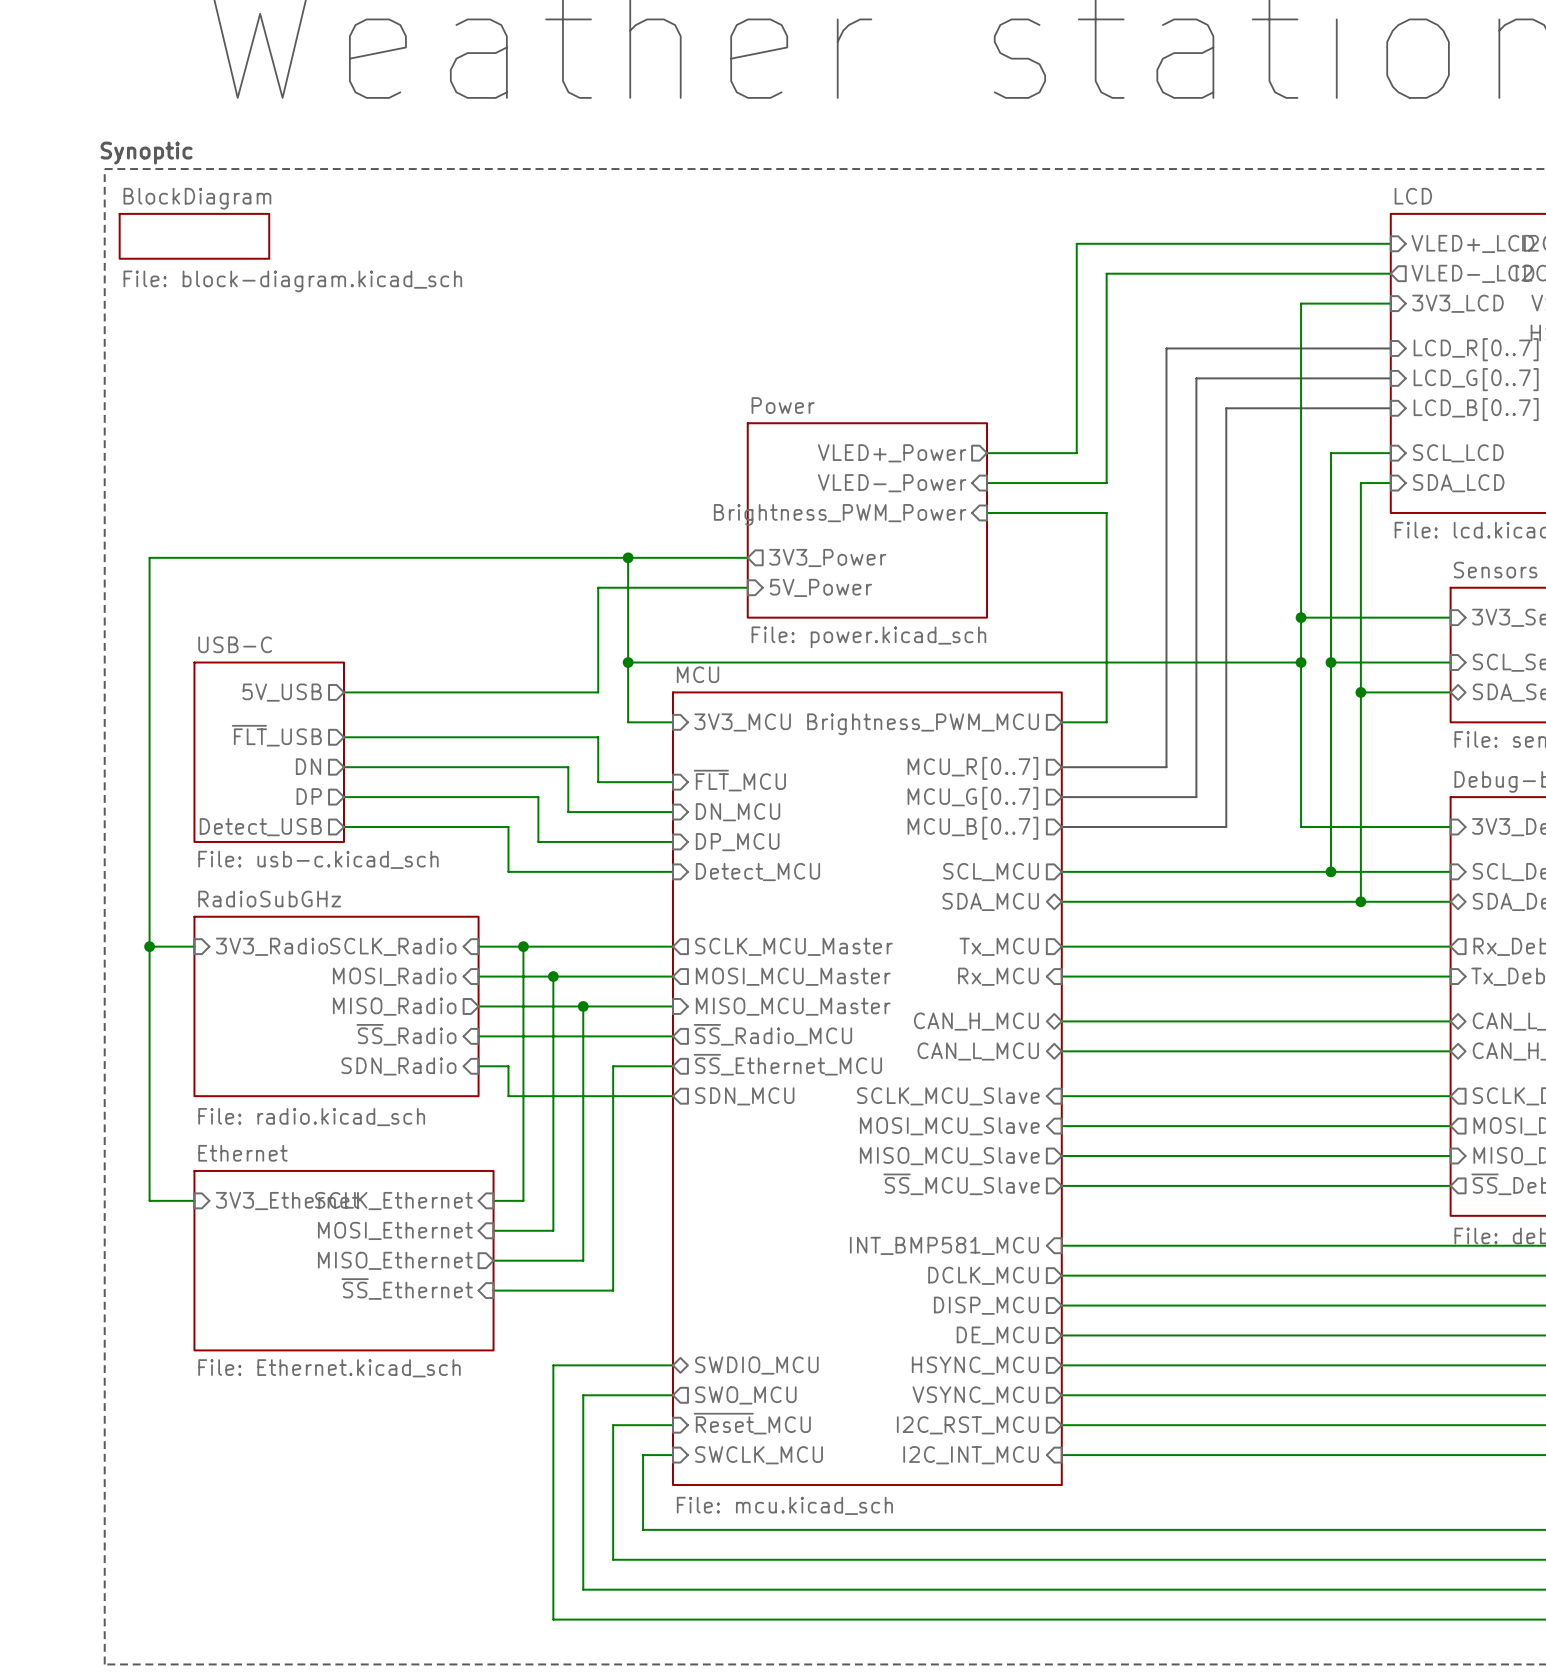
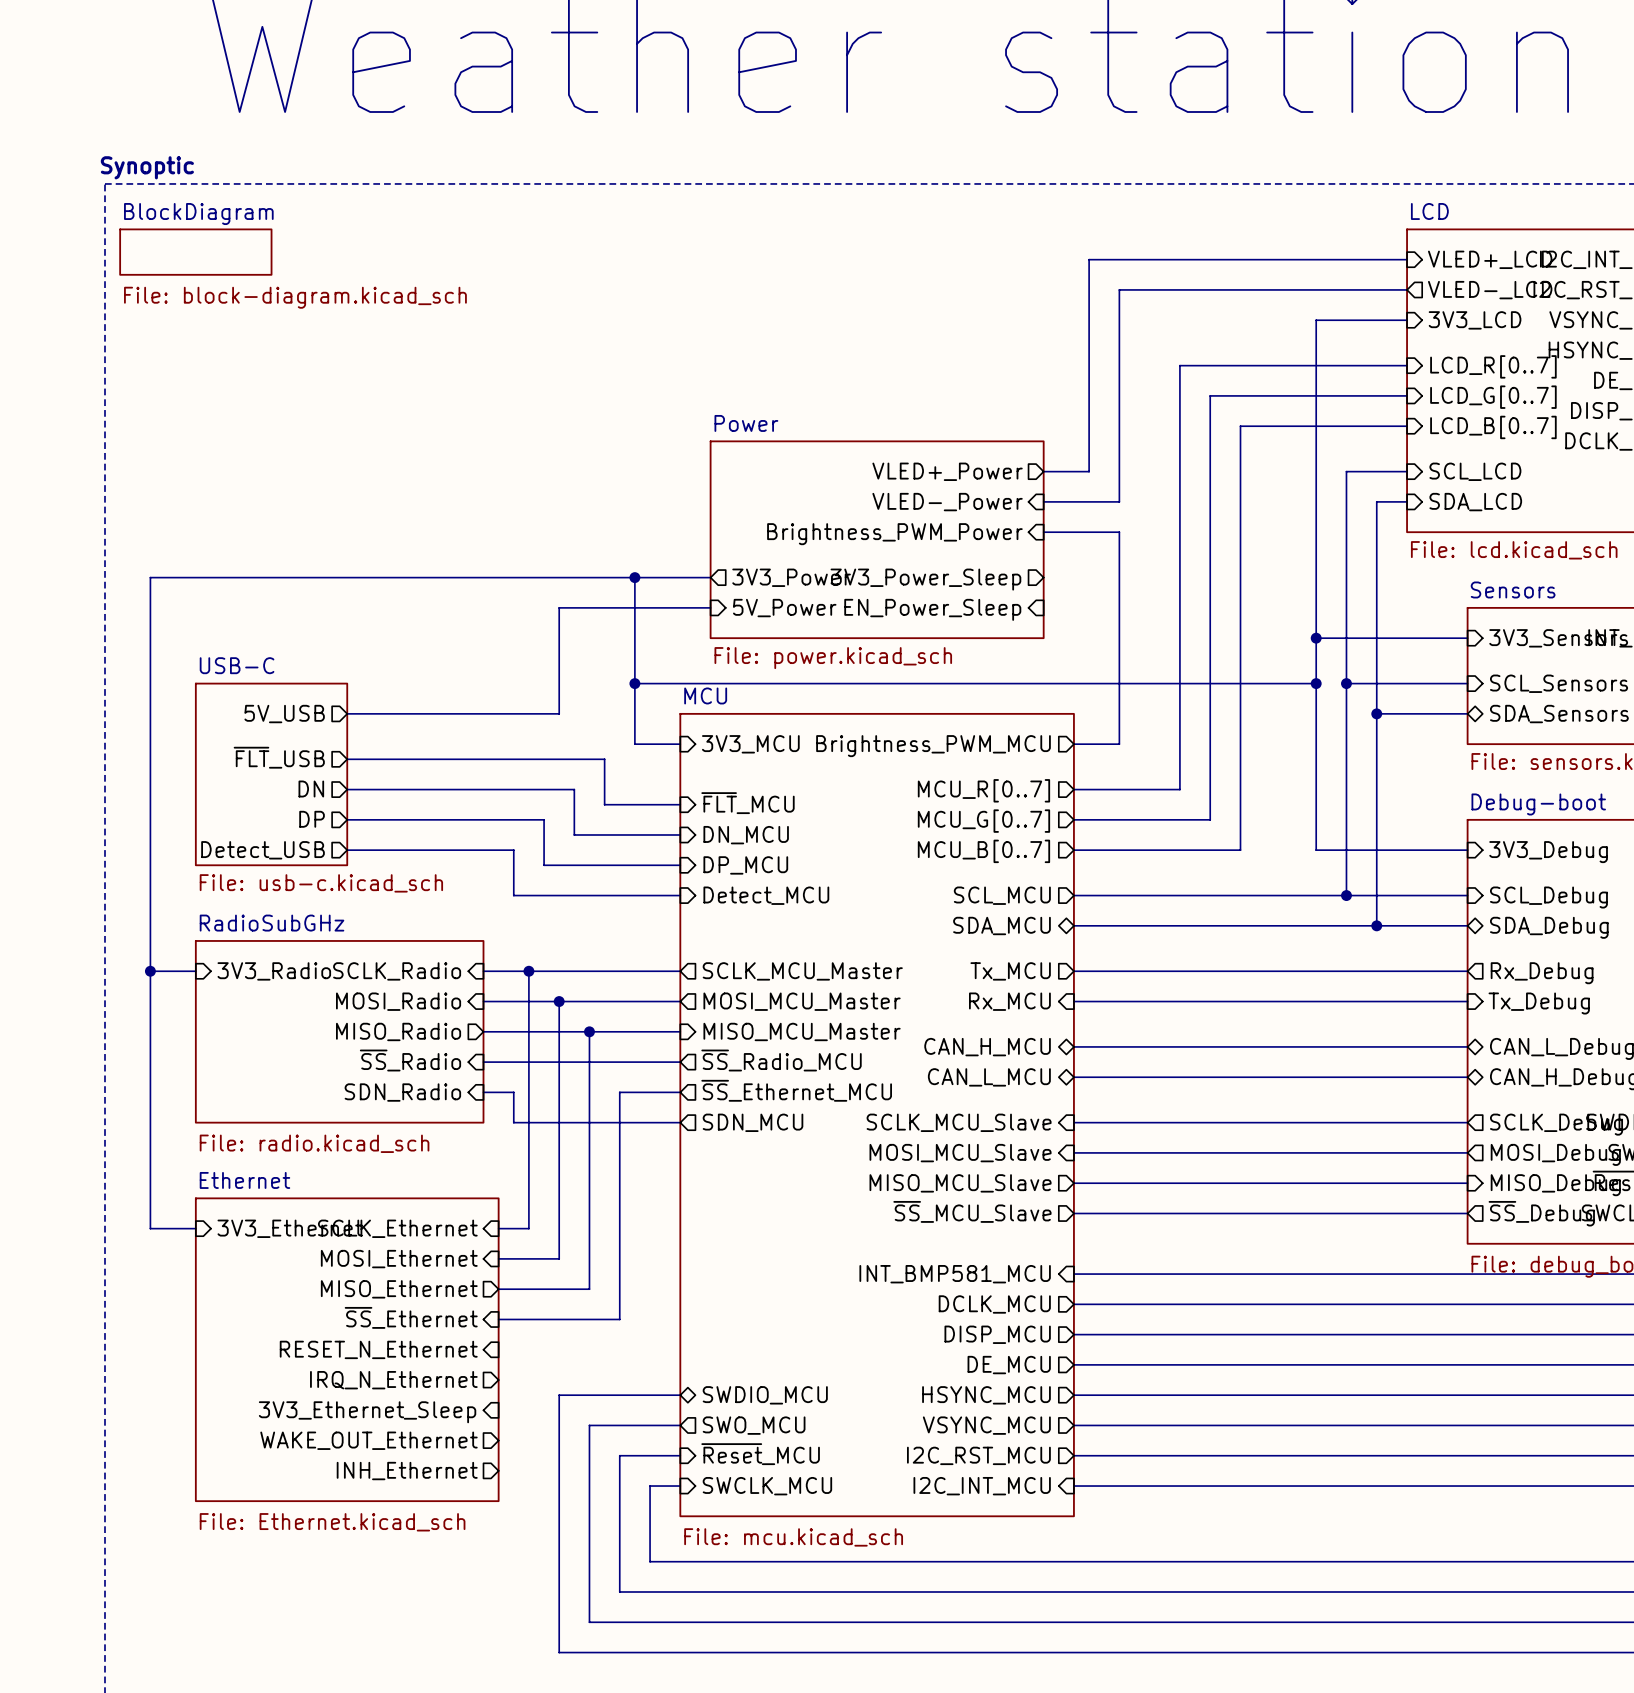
sheet Power name position: Power (783, 405) -> Power (746, 423)
sheet Power shape: [746, 422, 988, 619] -> [709, 440, 1045, 640]
sheet pin position: VLED+_Power (892, 453) -> VLED+_Power (947, 471)
wire: (987, 453) (1031, 453) -> none
sheet pin position: VLED-_Power (892, 483) -> VLED-_Power (947, 502)
wire: (987, 483) (1031, 483) -> none
wire: (987, 512) (1031, 512) -> none
sheet pin position: Brightness_PWM_Power (840, 514) -> Brightness_PWM_Power (894, 534)
wire: (702, 557) (747, 557) -> none
sheet pin position: 3V3_Power (827, 557) -> 3V3_Power (791, 577)
sheet pin: none -> 3V3_Power_Sleep (925, 579)
wire: (598, 587) (598, 692) (553, 692) -> (604, 607) (559, 607) (559, 713)
wire: (702, 587) (747, 587) -> none
sheet pin position: 5V_Power (820, 587) -> 5V_Power (784, 608)
sheet pin: none -> EN_Power_Sleep (932, 609)
sheet Power value position: File: power.kicad_sch (868, 637) -> File: power.kicad_sch (833, 658)
sheet Ethernet: File: Ethernet.kicad_sch (343, 1260) -> none
sheet Ethernet: none -> File: Ethernet.kicad_sch (347, 1349)
sheet pin: none -> RESET_N_Ethernet (378, 1349)
sheet pin: none -> IRQ_N_Ethernet (393, 1380)
sheet pin: none -> 3V3_Ethernet_Sleep (367, 1412)
sheet pin: none -> WAKE_OUT_Ethernet (368, 1440)
sheet pin: none -> INH_Ethernet (407, 1471)

